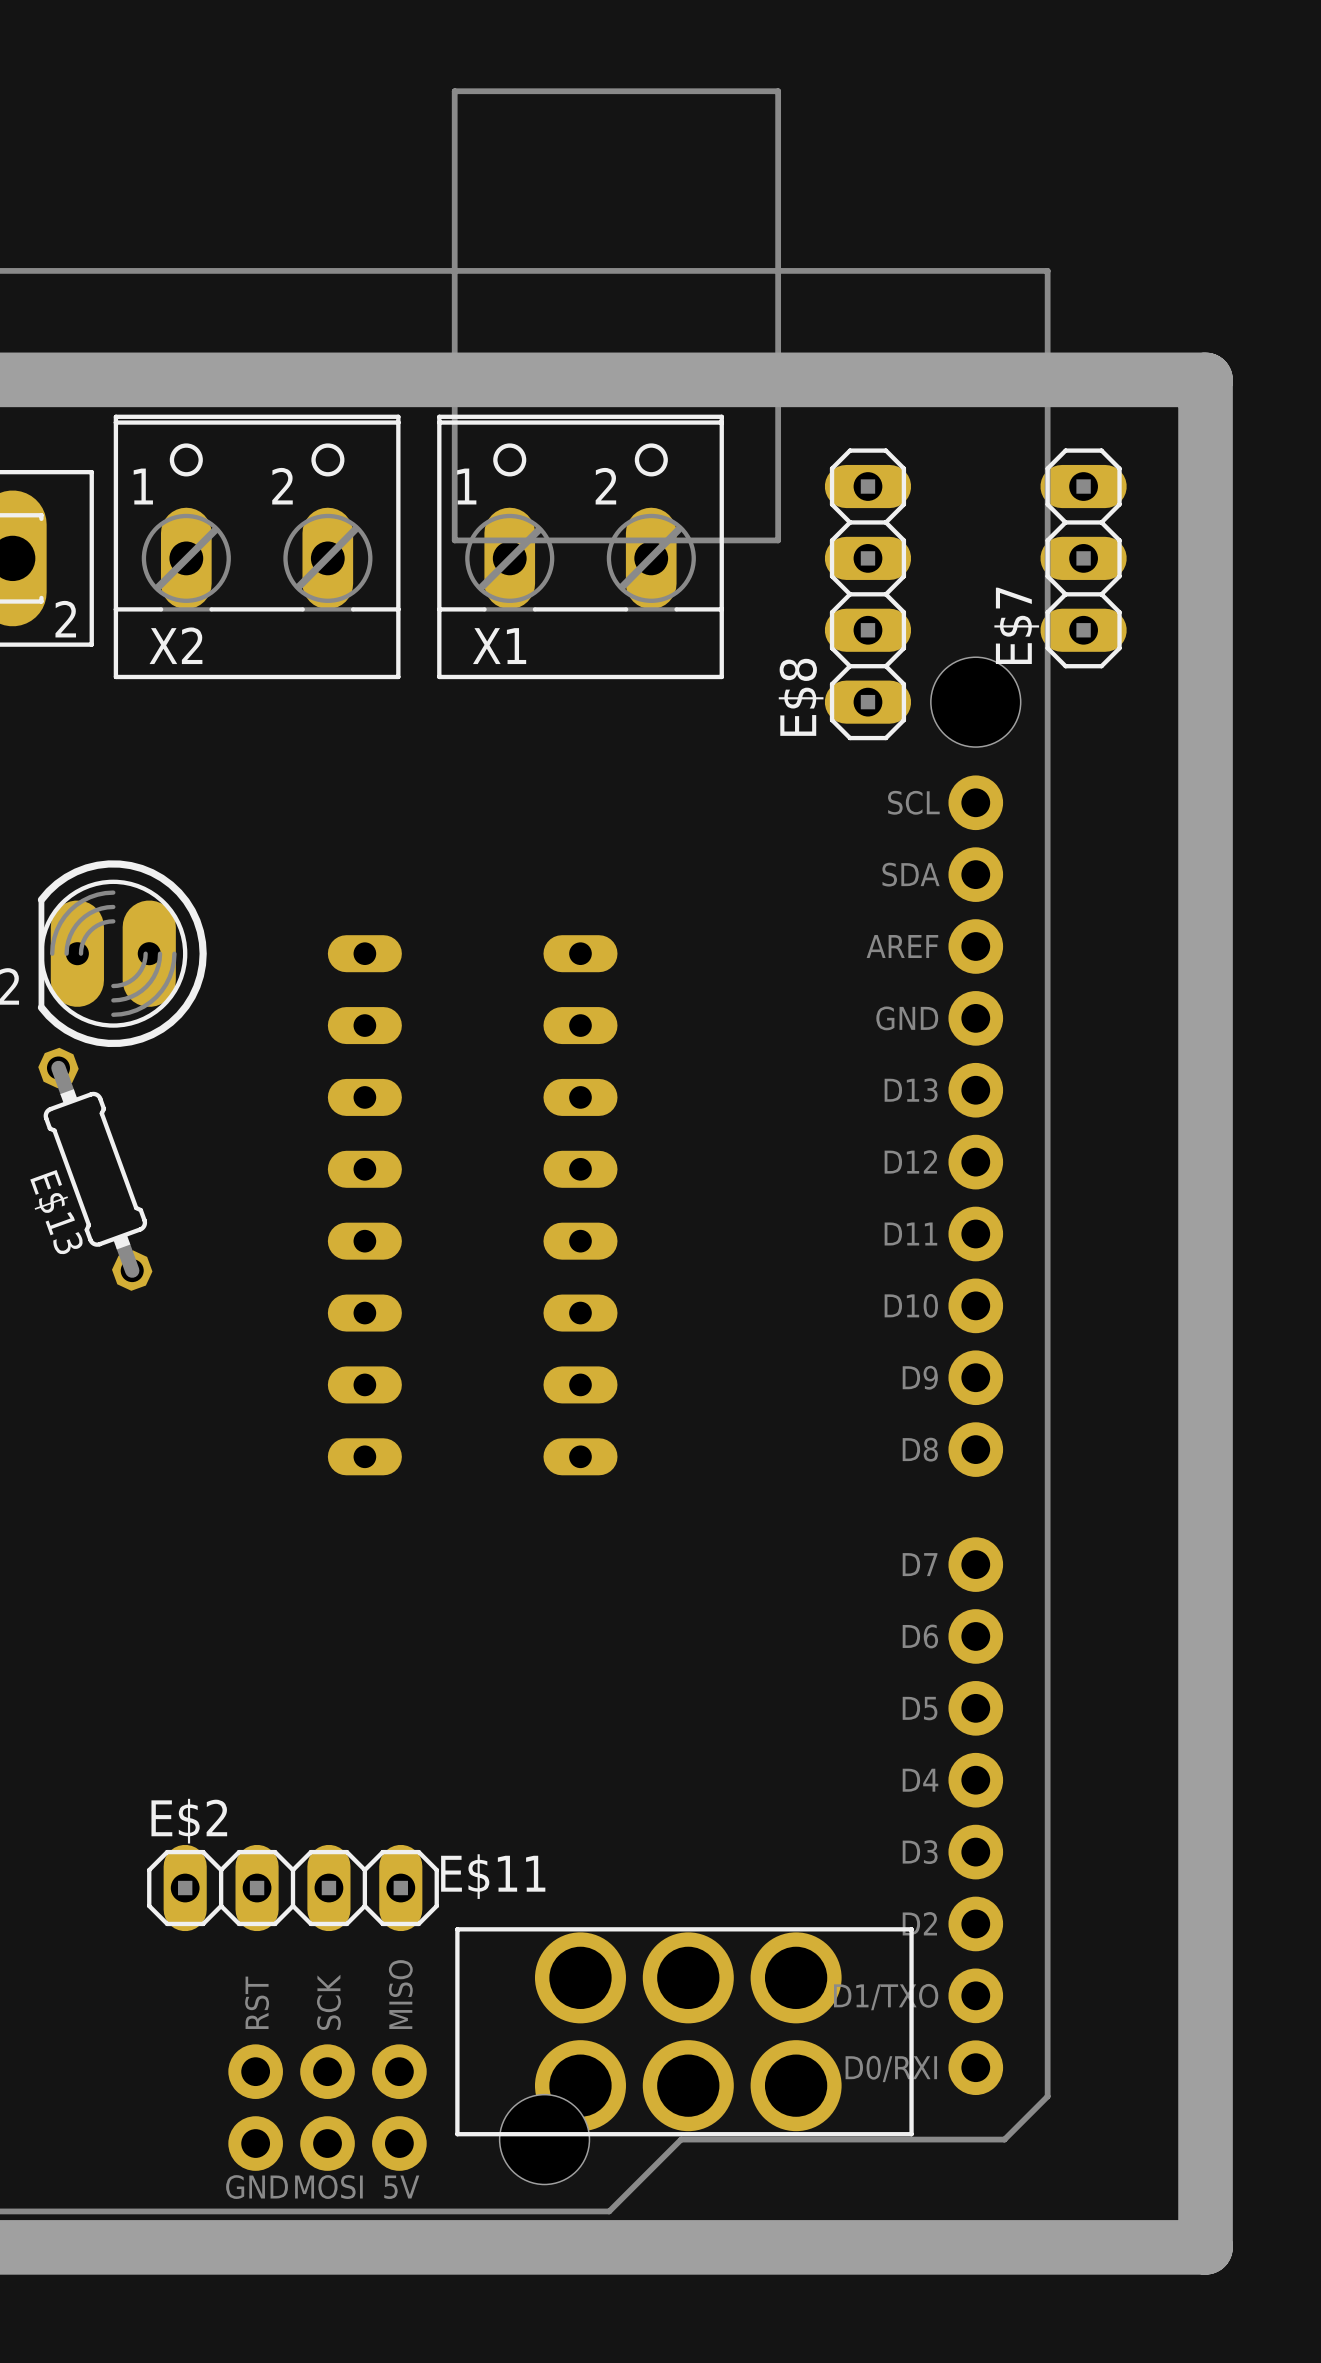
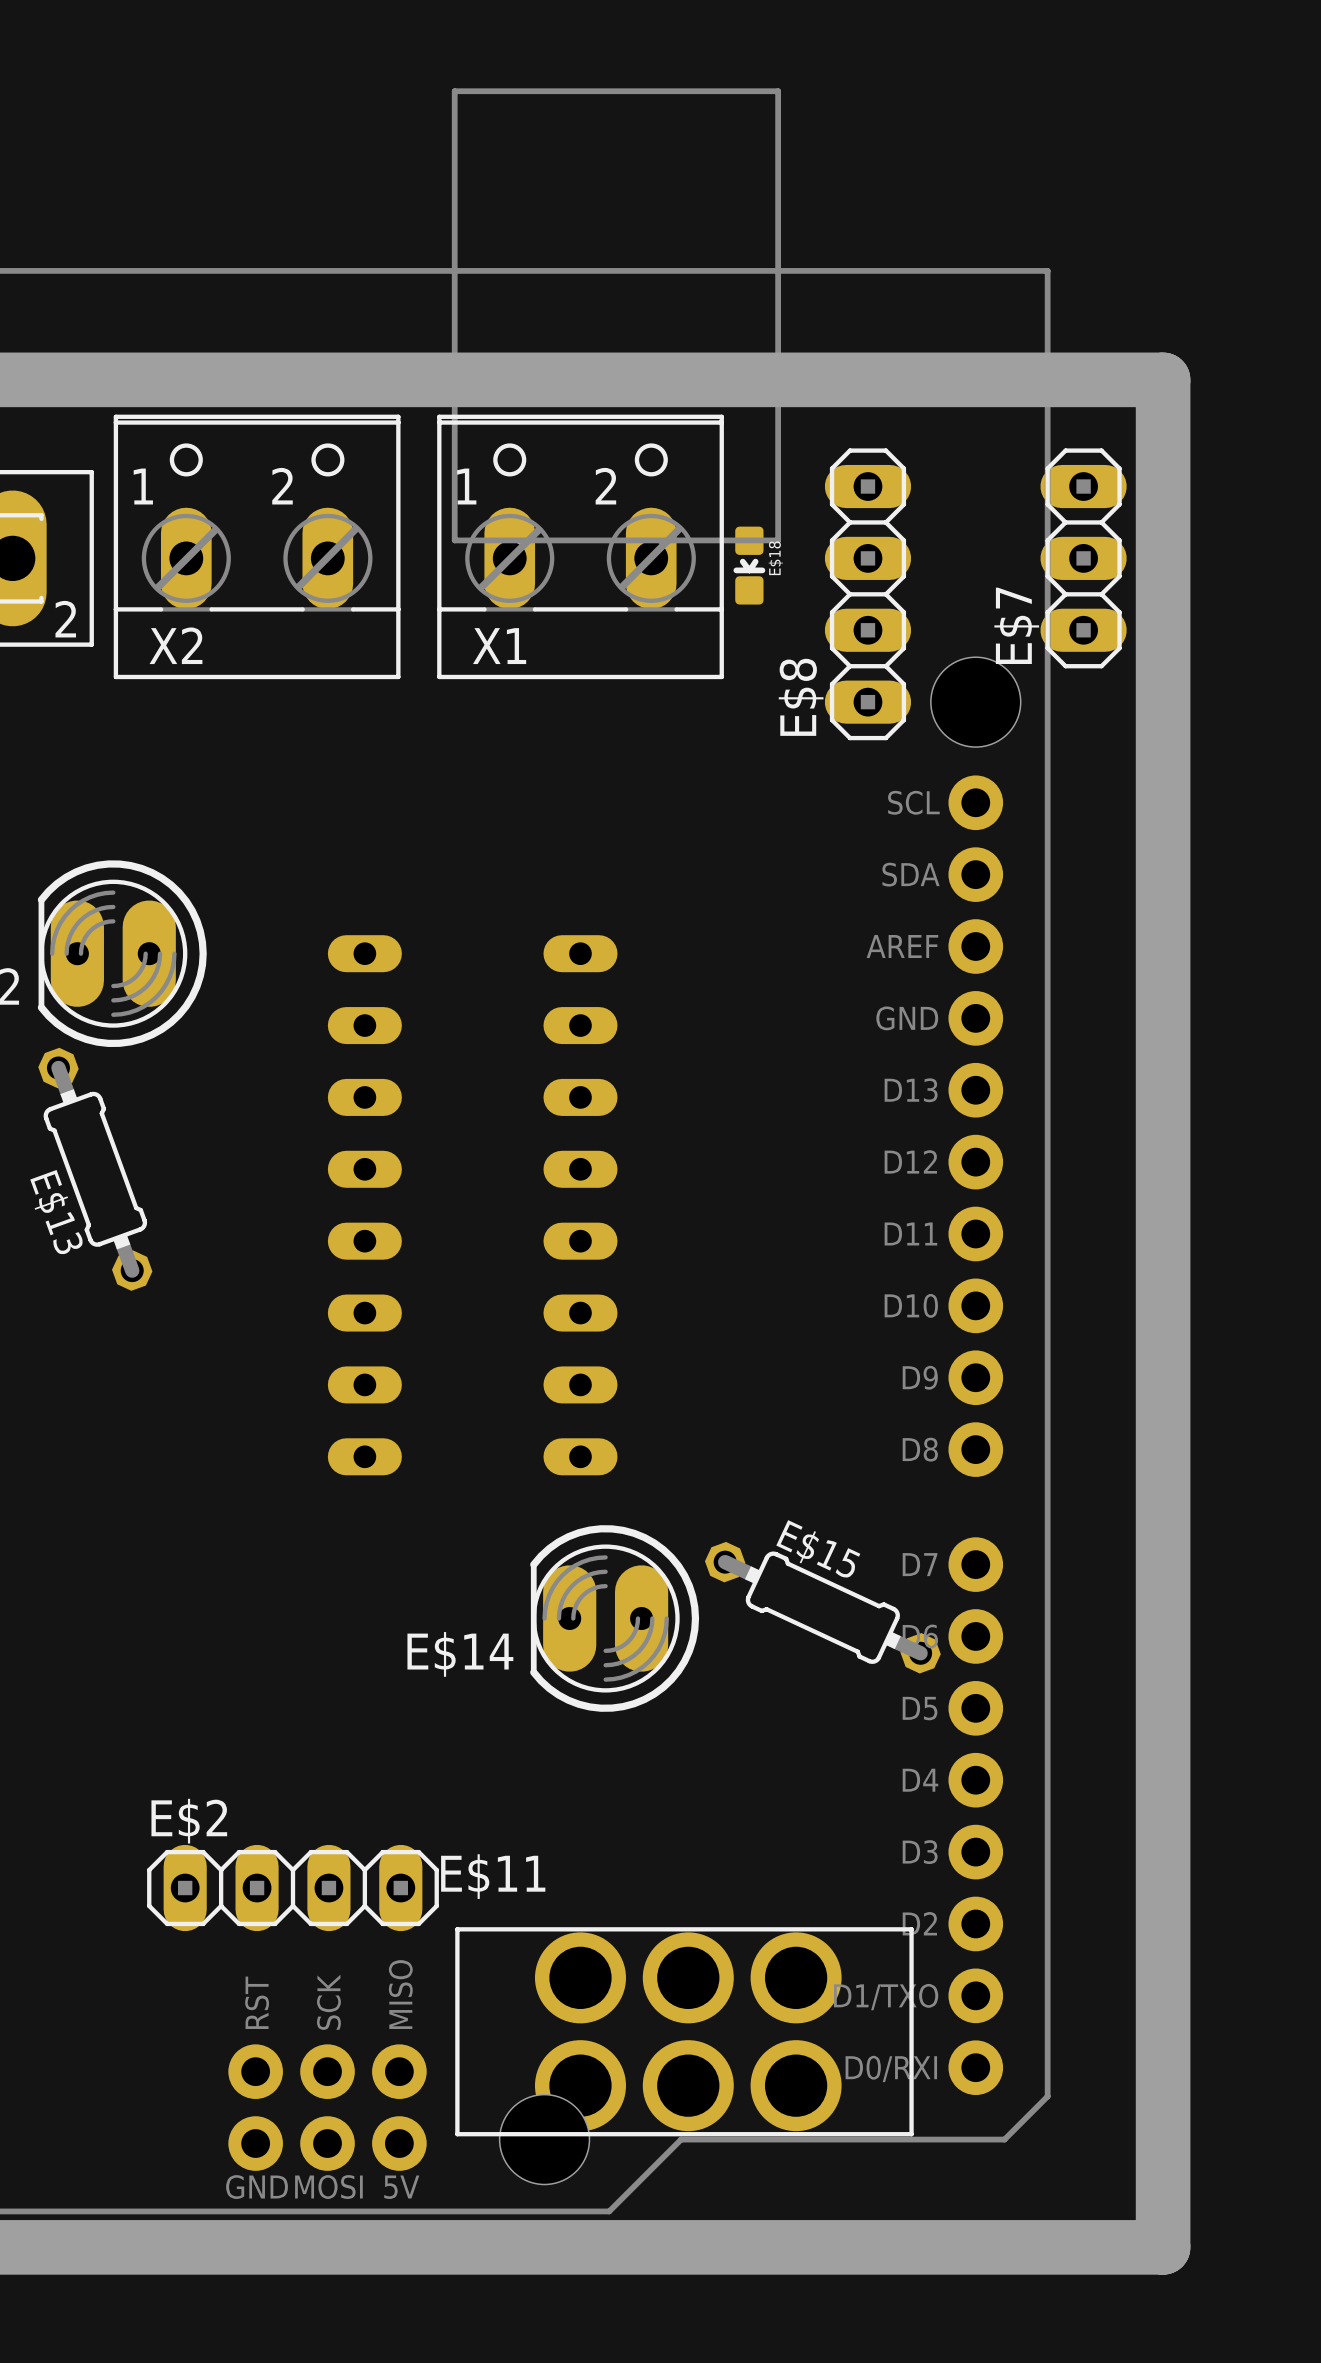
board edge: (1163, 379) (1205, 379) (1205, 2247) (1163, 2247) -> (1163, 379) (1163, 2247)
E$18: none -> (749, 565)
E$15: none -> (822, 1607)
E$14: none -> (614, 1618)

